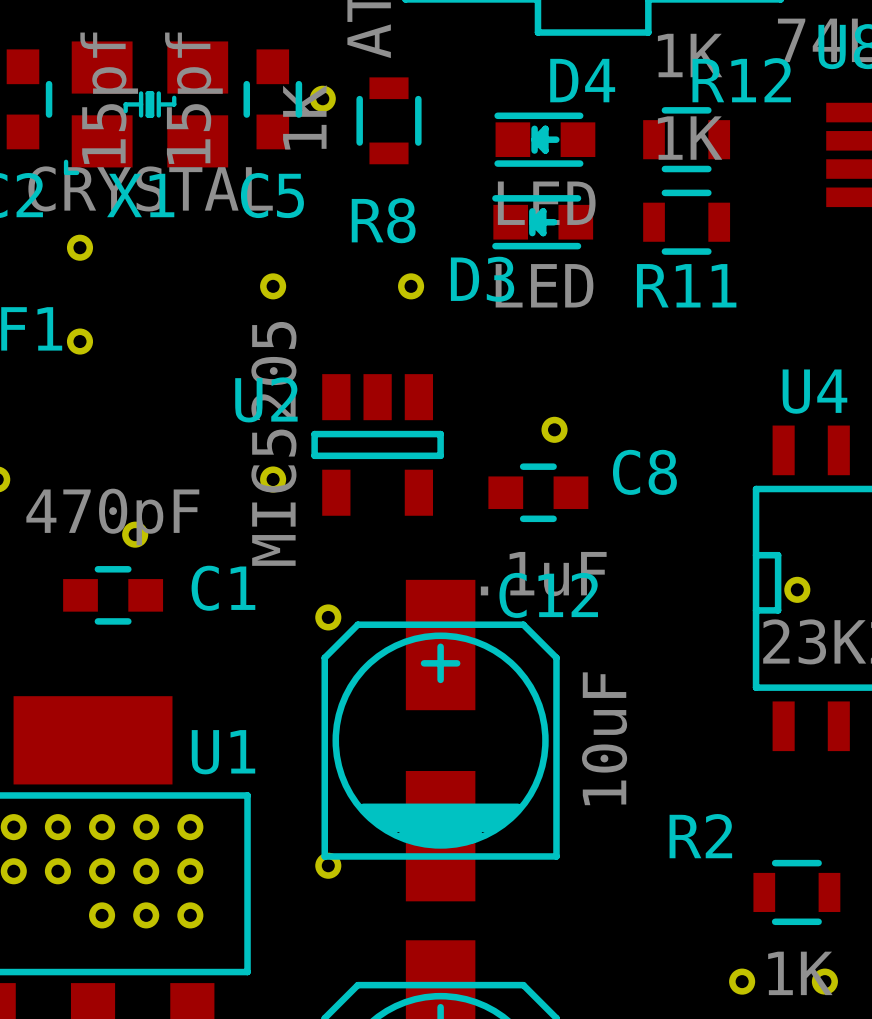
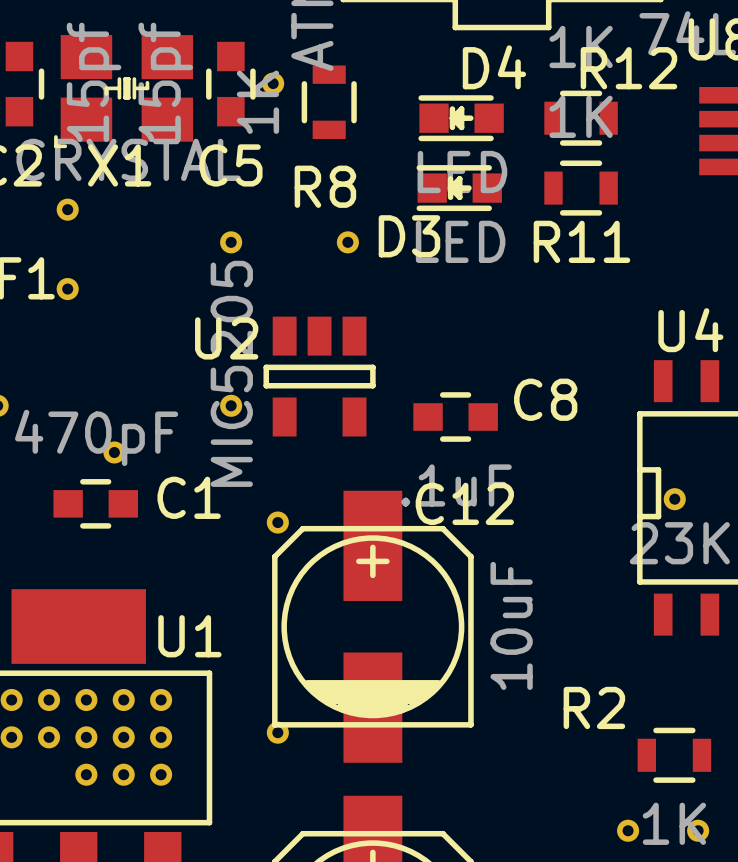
part: (554, 429) -> none

